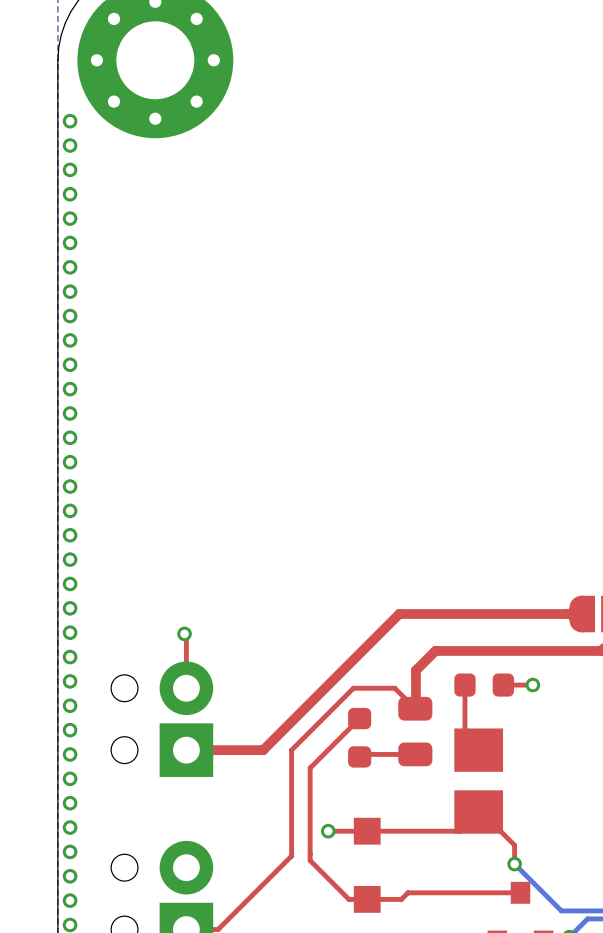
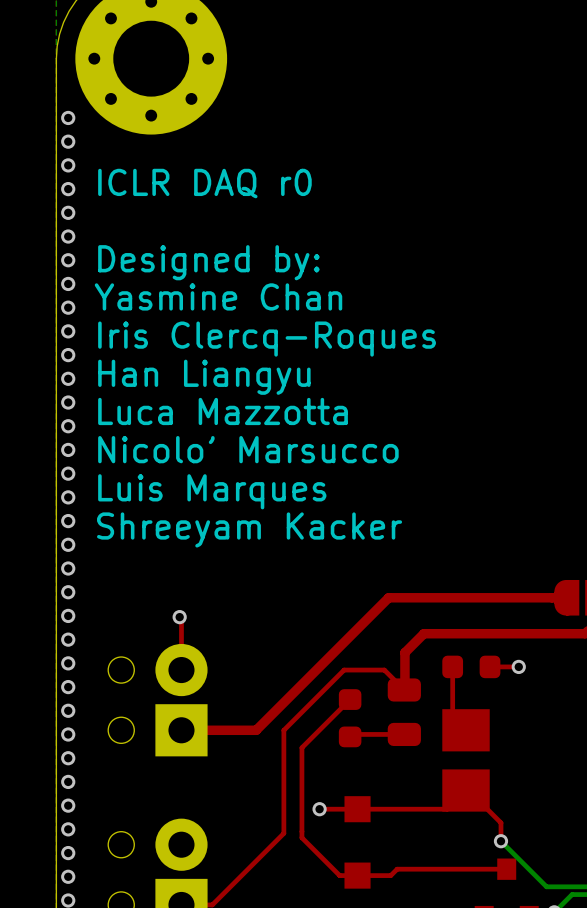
text: none -> ICLR DAQ r0 (204, 183)
text: none -> Designed by: (208, 262)
text: none -> Yasmine Chan (218, 296)
text: none -> Iris Clercq-Roques (267, 339)
text: none -> Han Liangyu (204, 377)
text: none -> Luca Mazzotta (223, 411)
text: none -> Nicolo’ Marsucco (248, 449)
text: none -> Luis Marques (212, 491)
text: none -> Shreeyam Kacker (249, 529)

